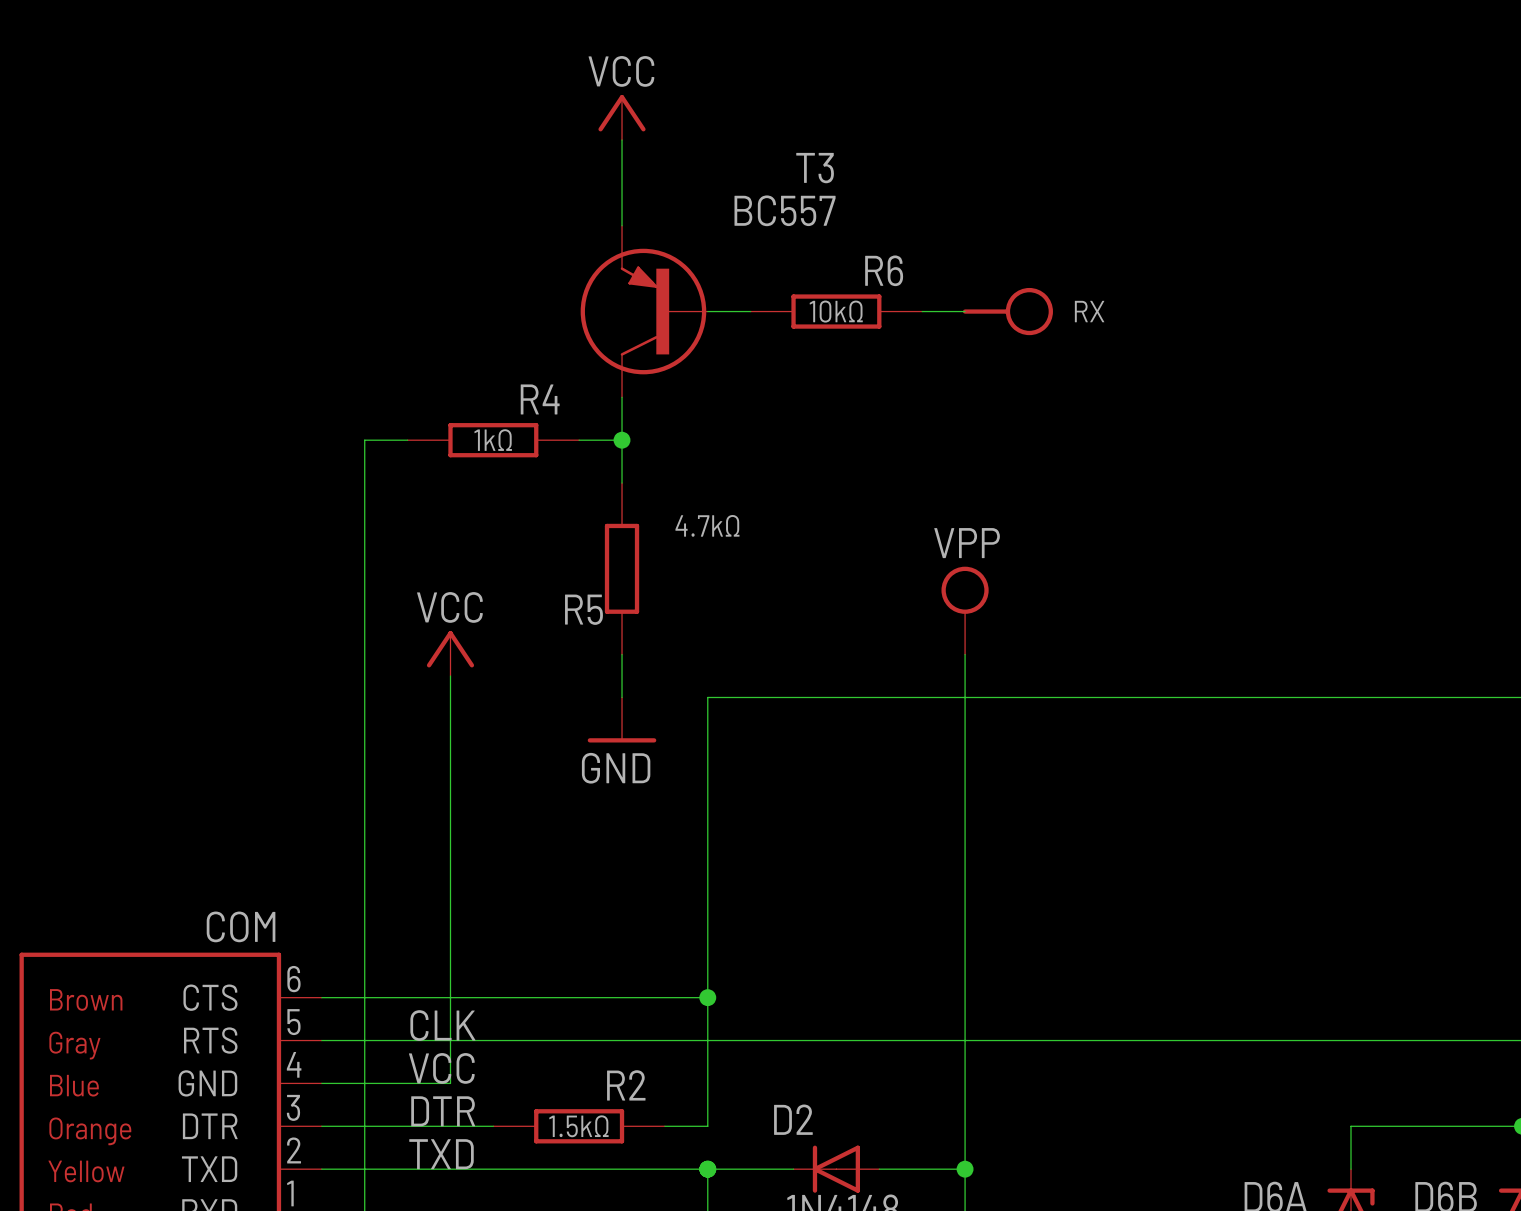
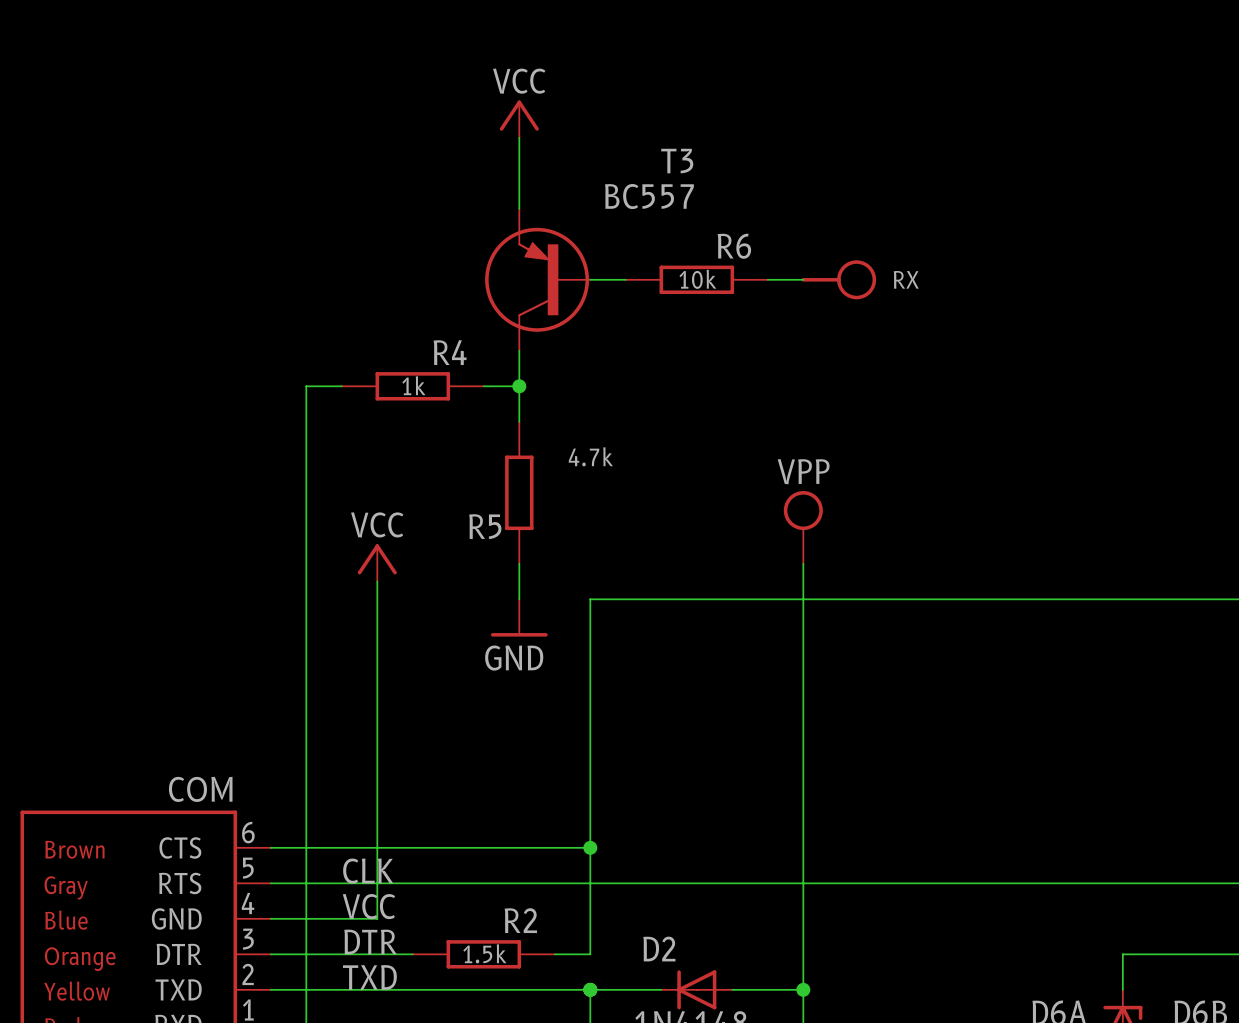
R6 value: 10kΩ (836, 311) -> 10k (697, 279)
R4 value: 1kΩ (493, 440) -> 1k (413, 385)
R5 value: 4.7kΩ (707, 525) -> 4.7k (590, 456)
R2 value: 1.5kΩ (578, 1126) -> 1.5k (484, 953)

